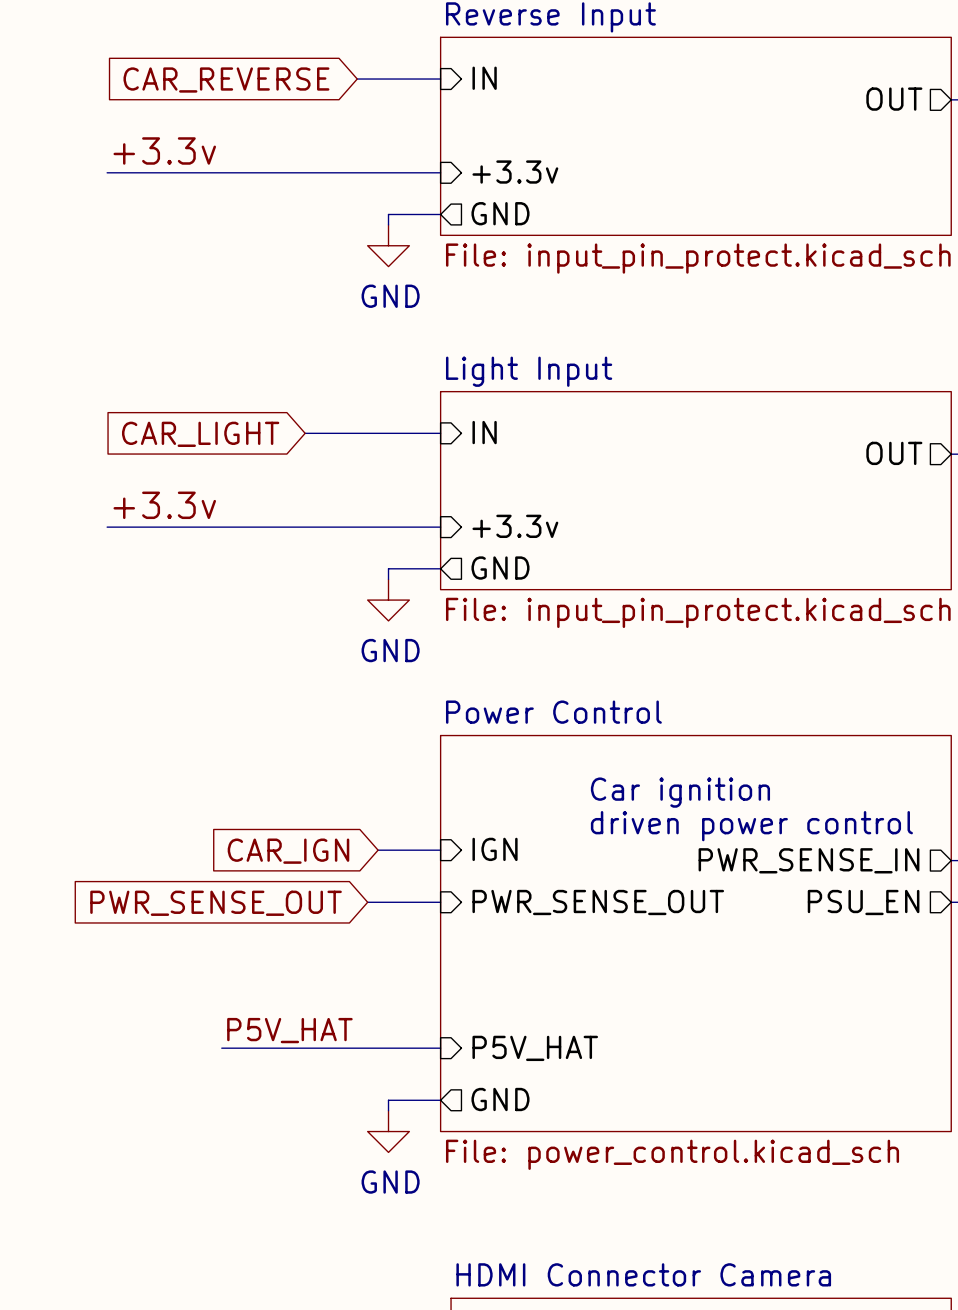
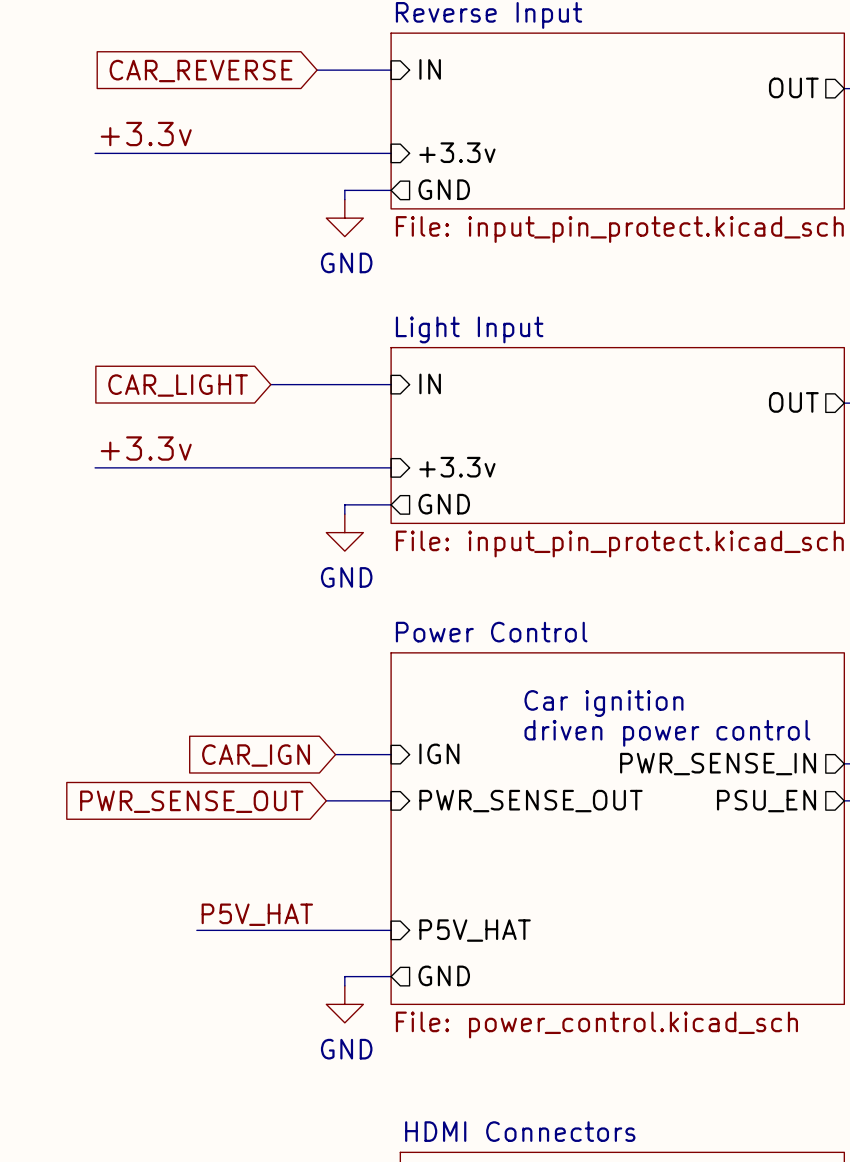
sheet HDMI Connector Camera name: HDMI Connector Camera (643, 1274) -> HDMI Connectors (520, 1131)

